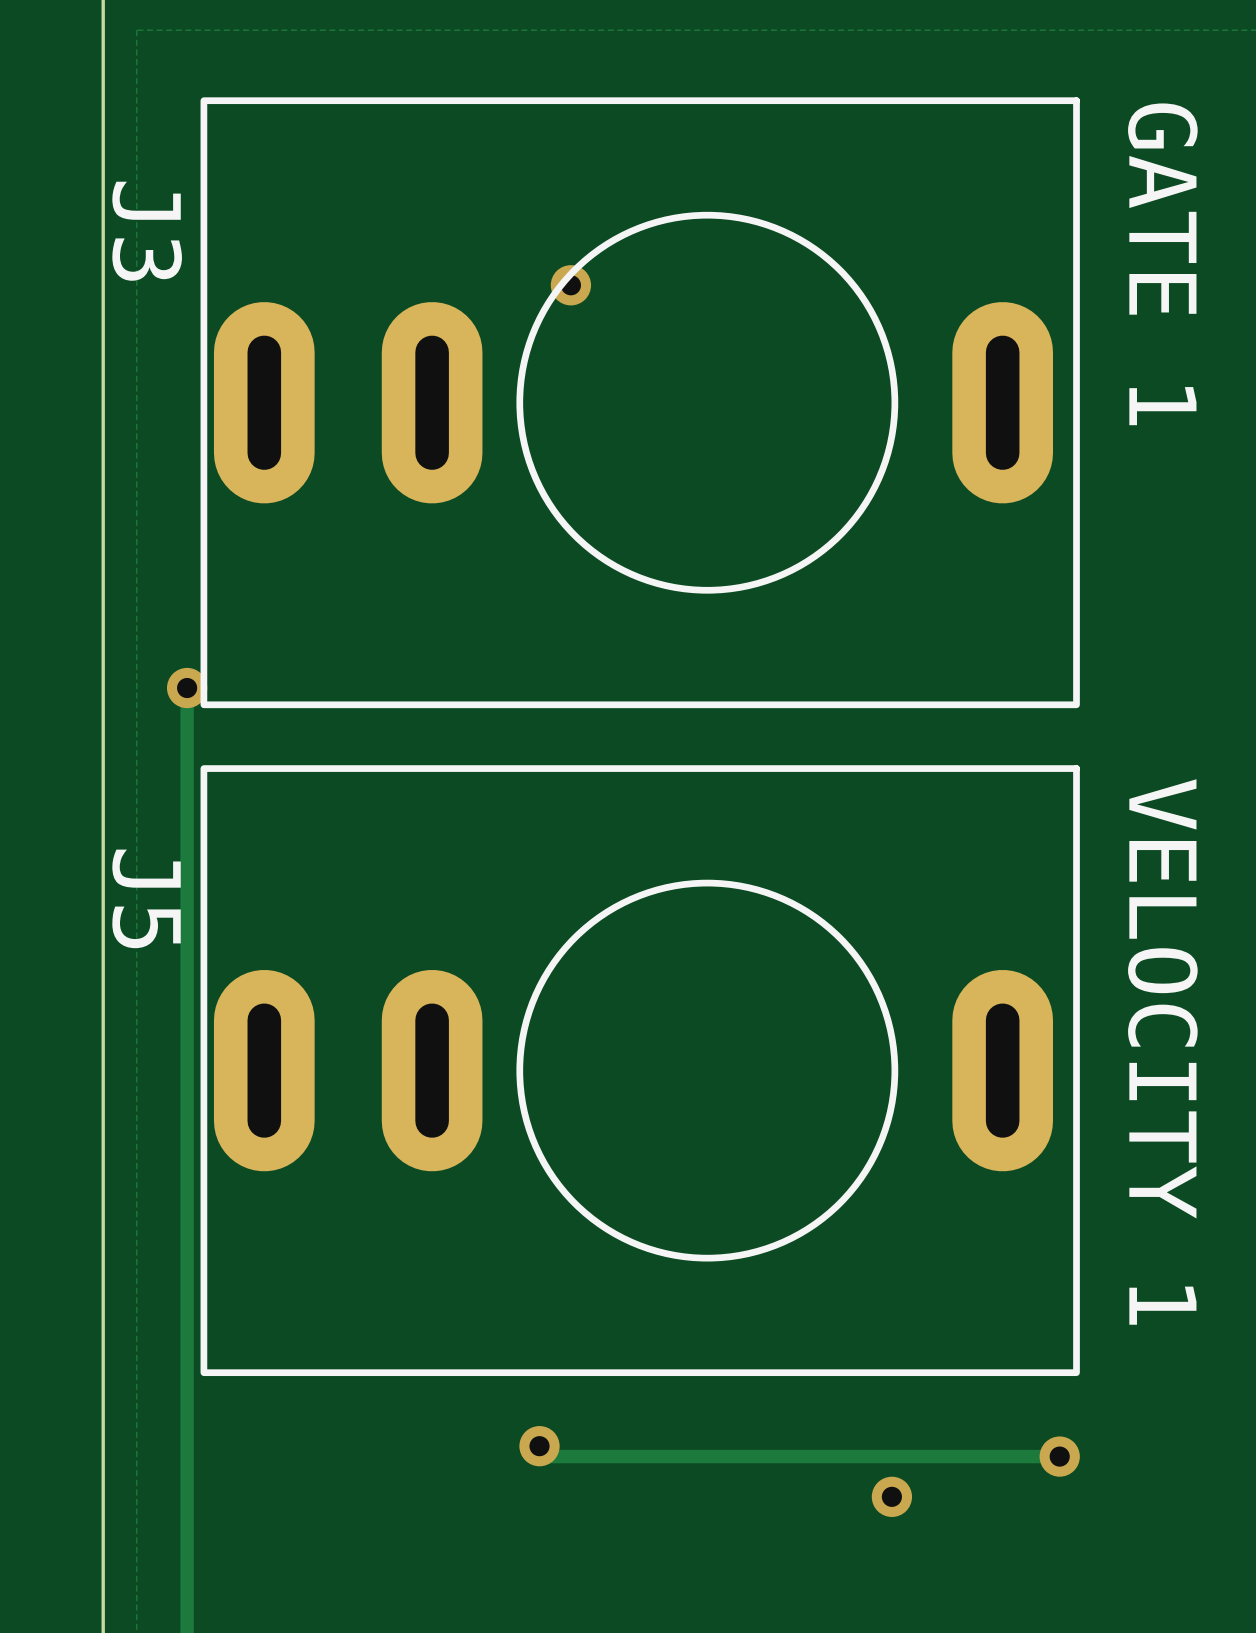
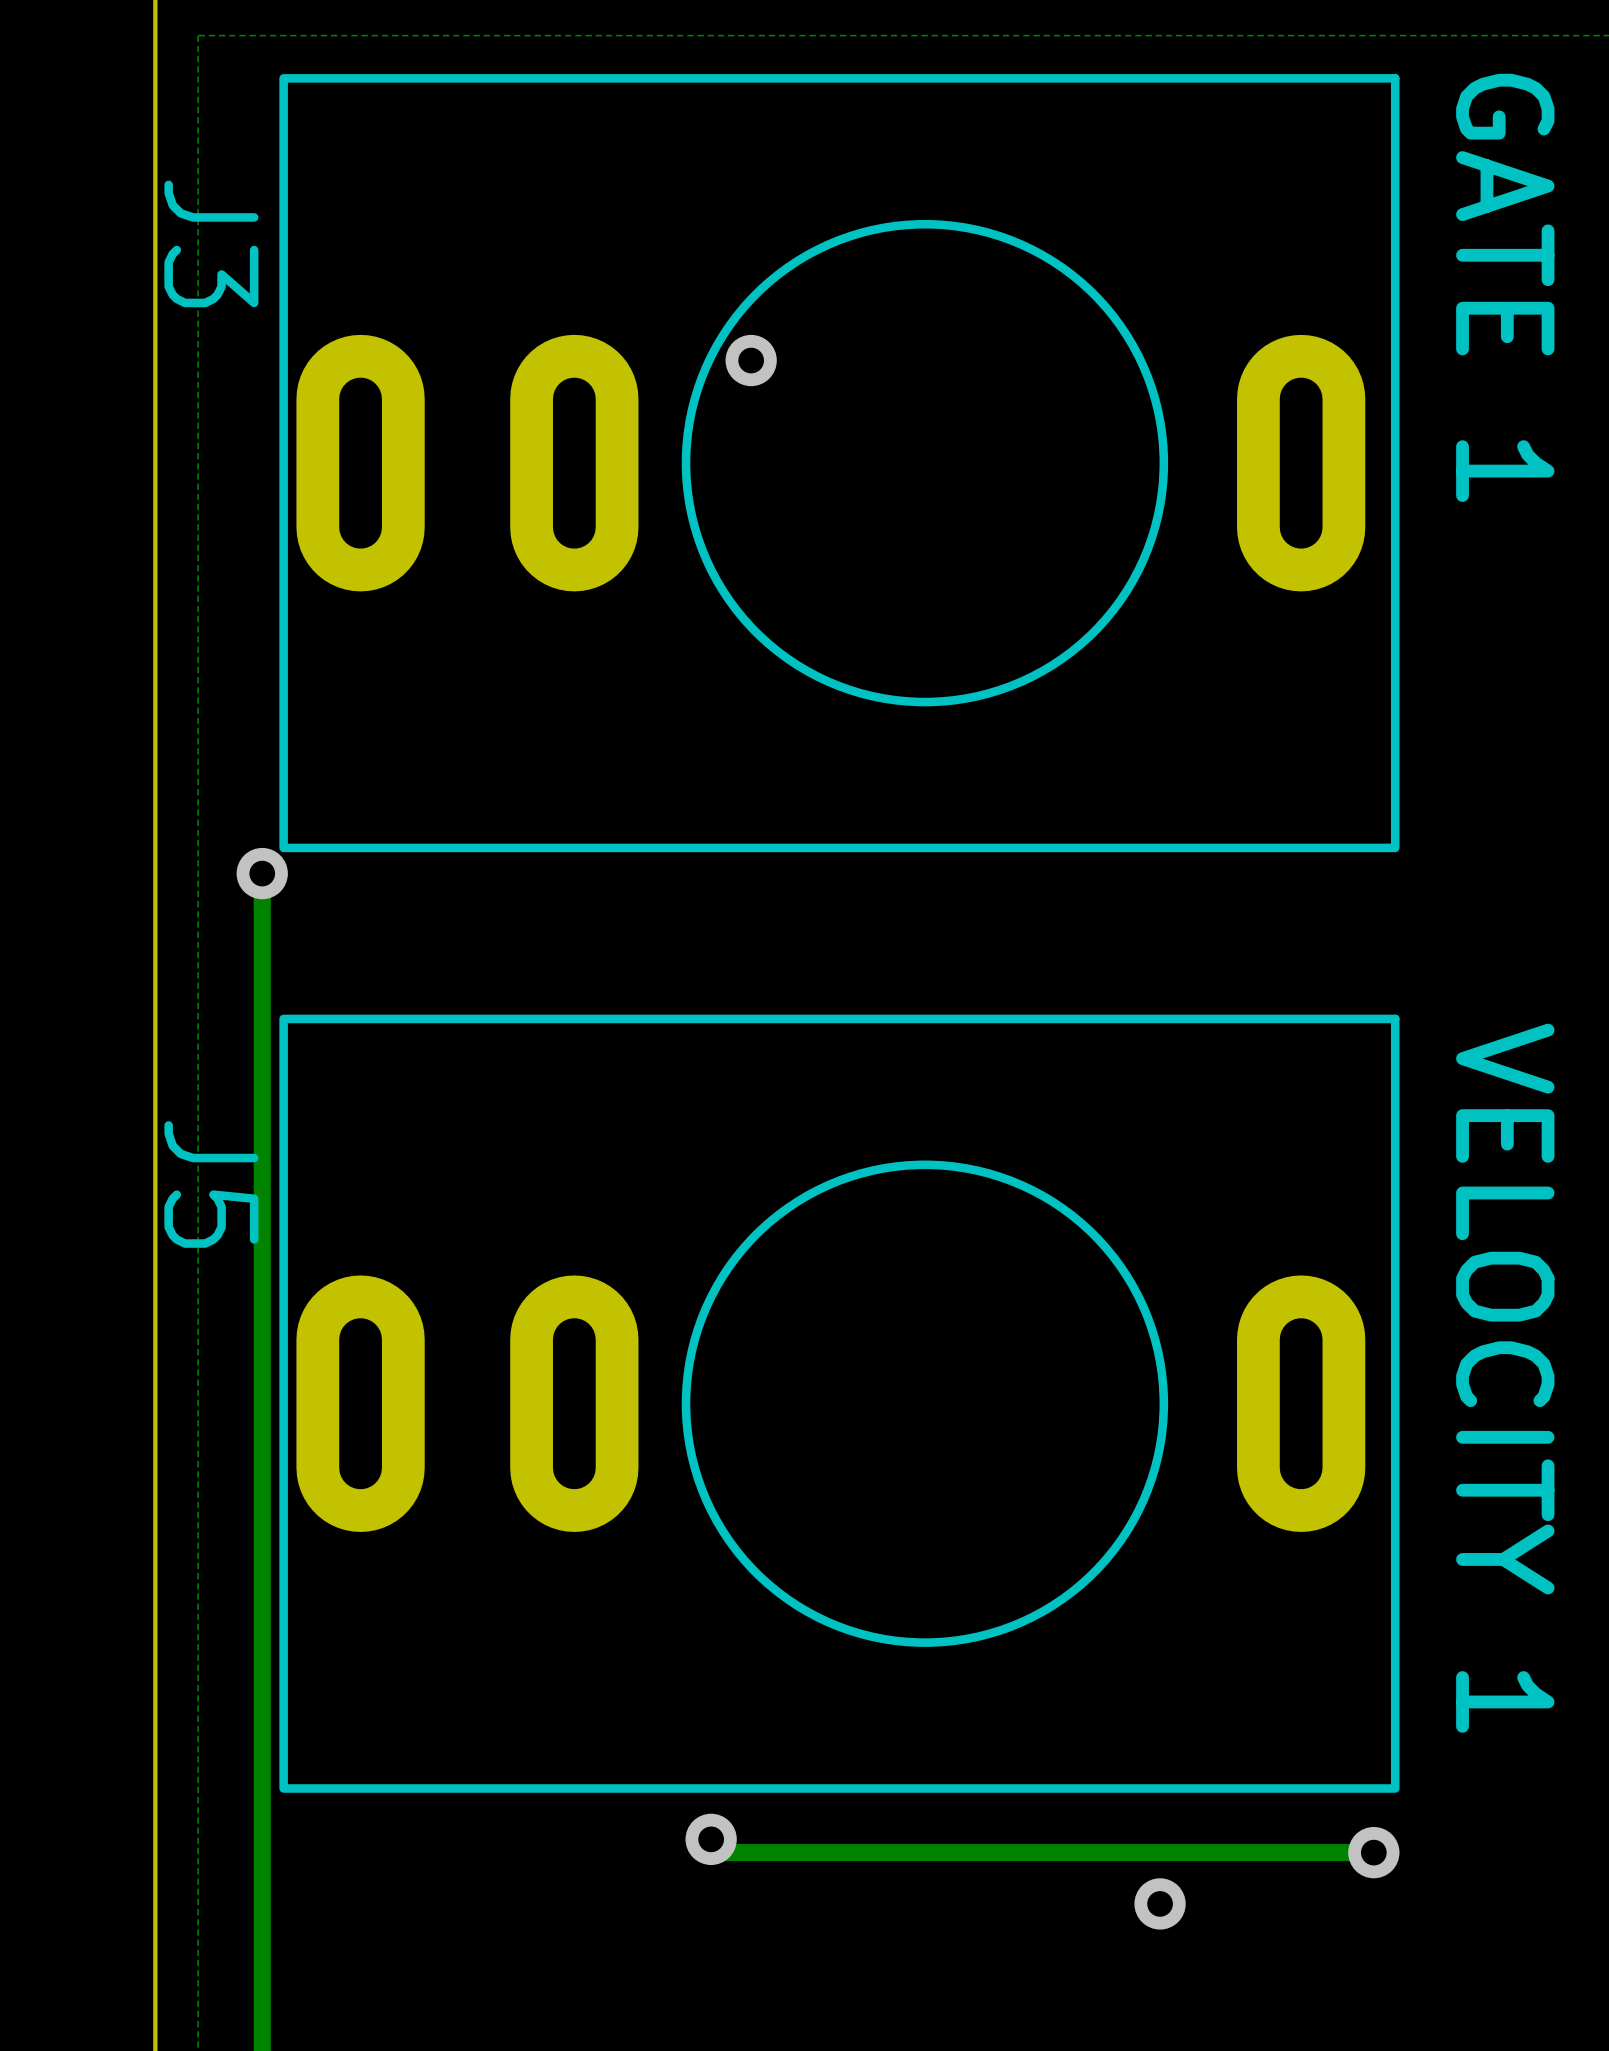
J3 position: (640, 402) -> (839, 463)
J5 position: (640, 1070) -> (839, 1403)

